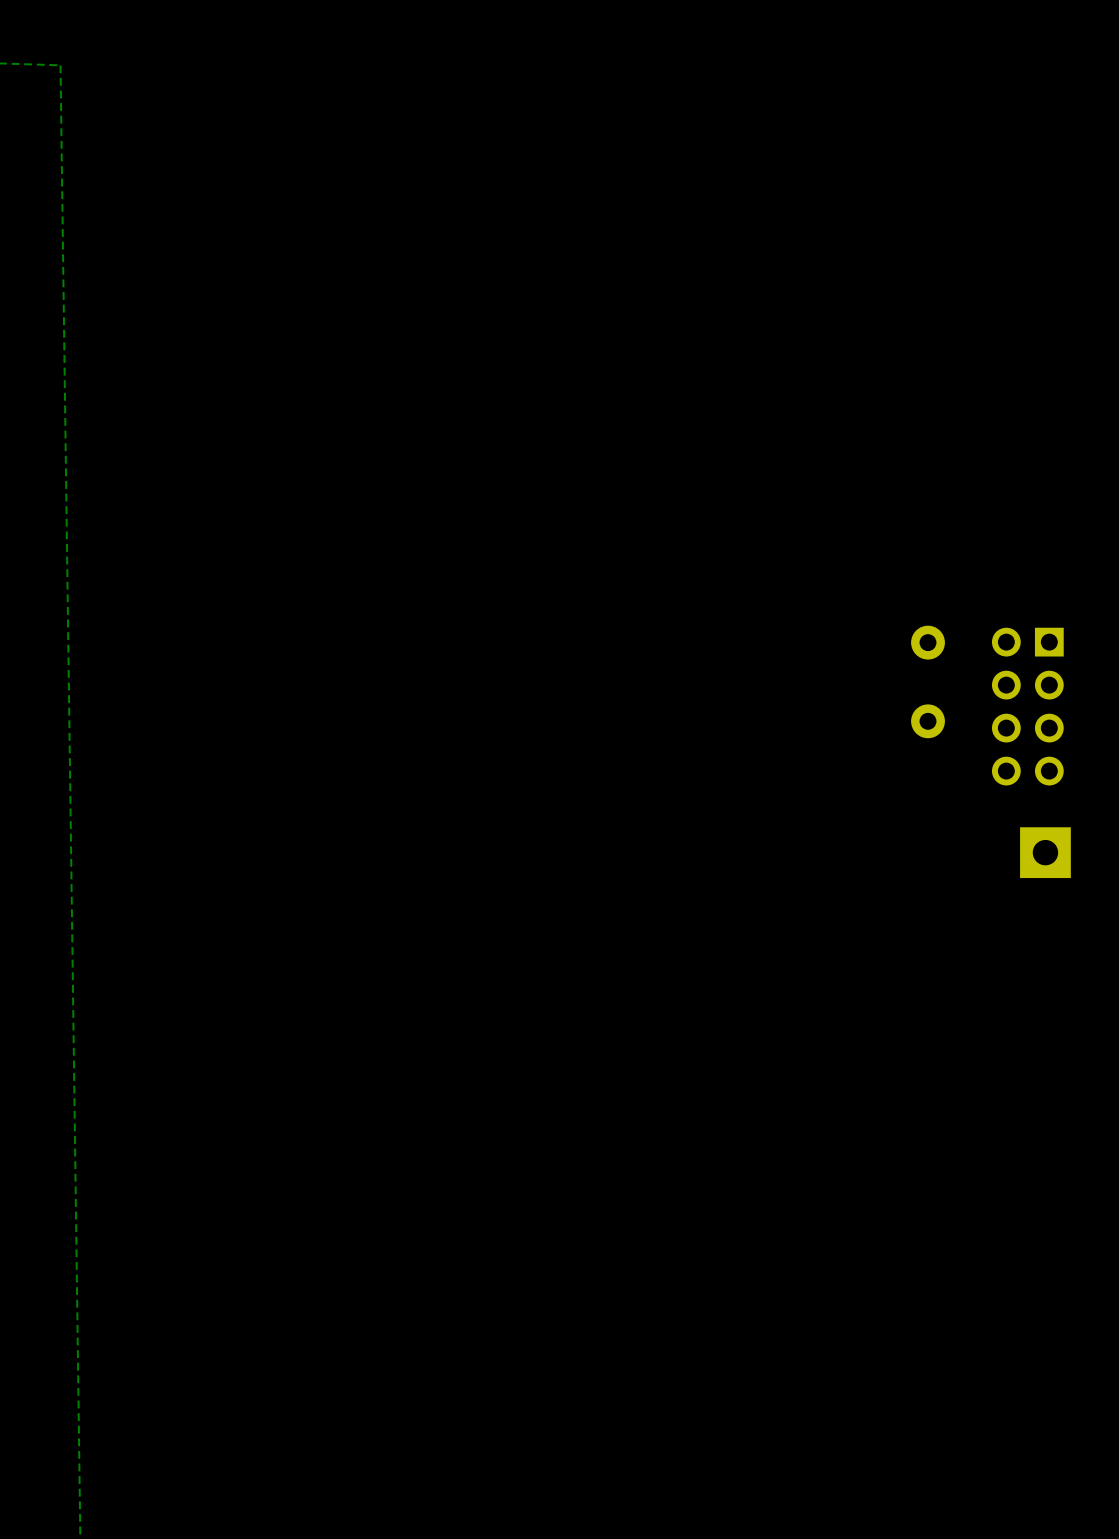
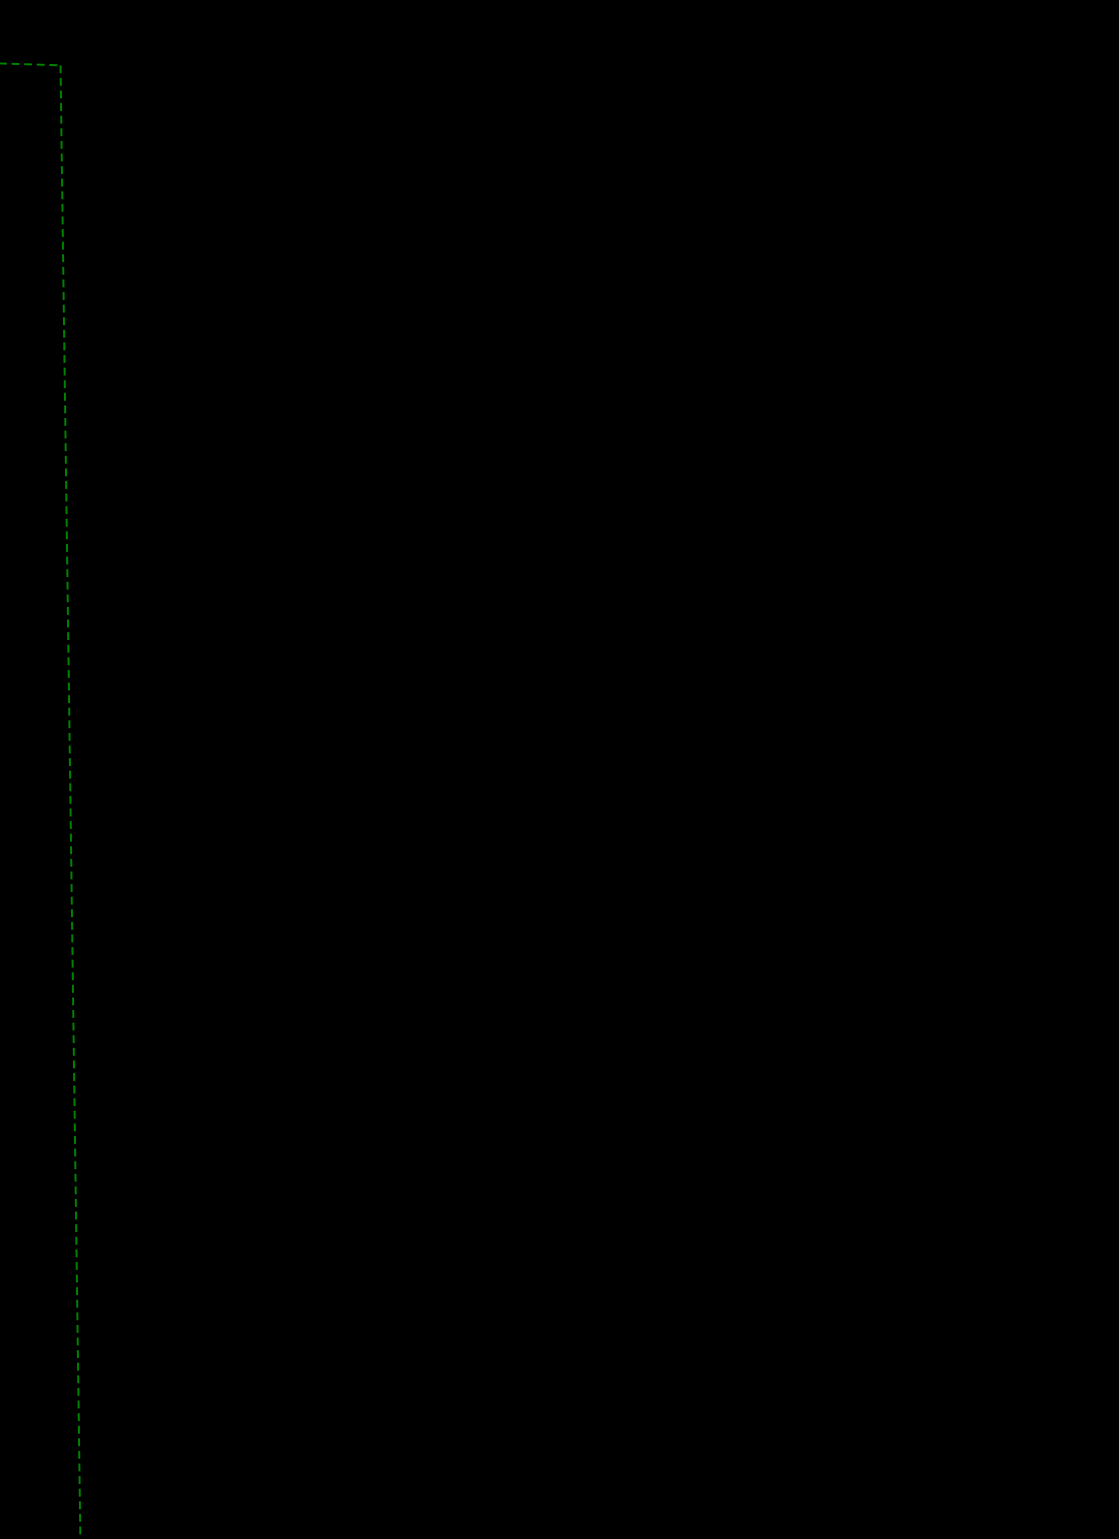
part: (928, 642) -> none
part: (1027, 706) -> none
part: (928, 721) -> none
part: (1045, 852) -> none

